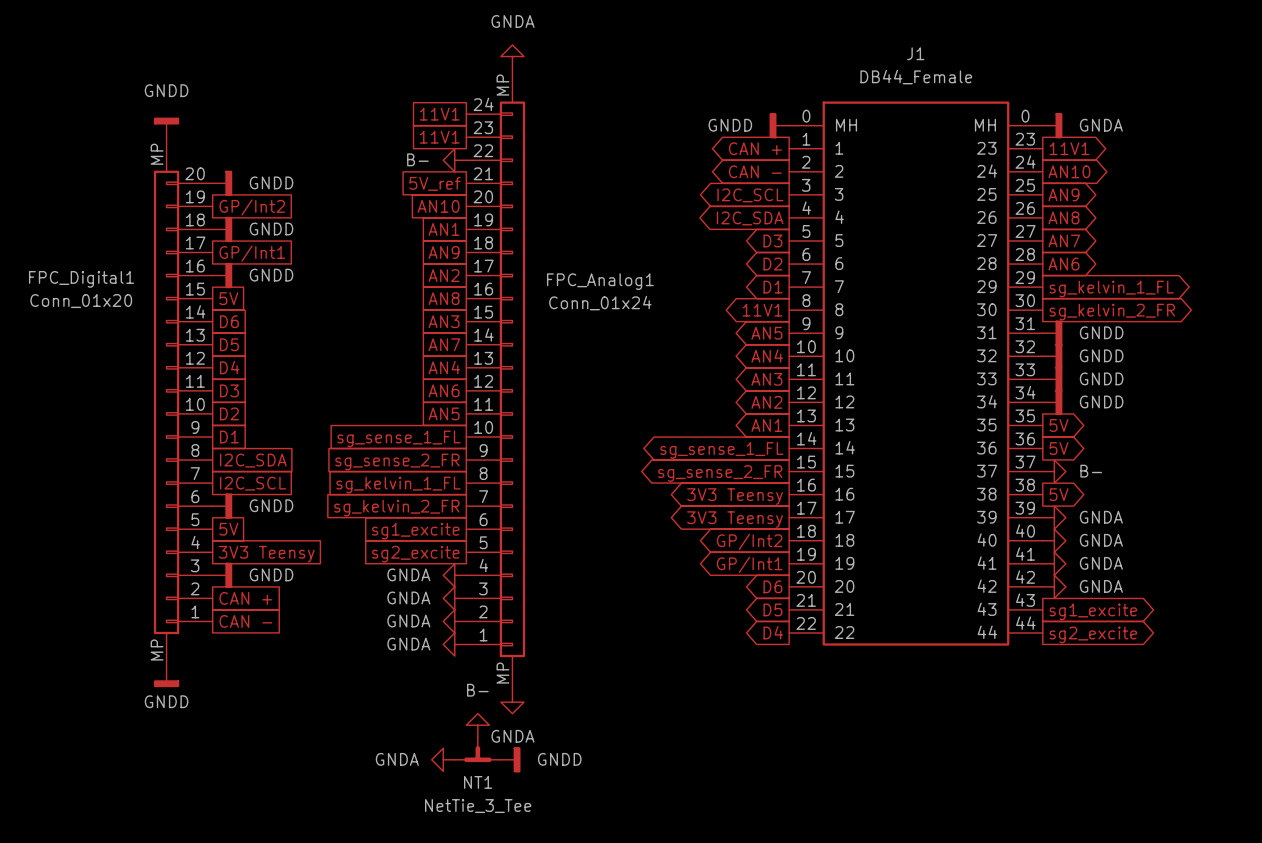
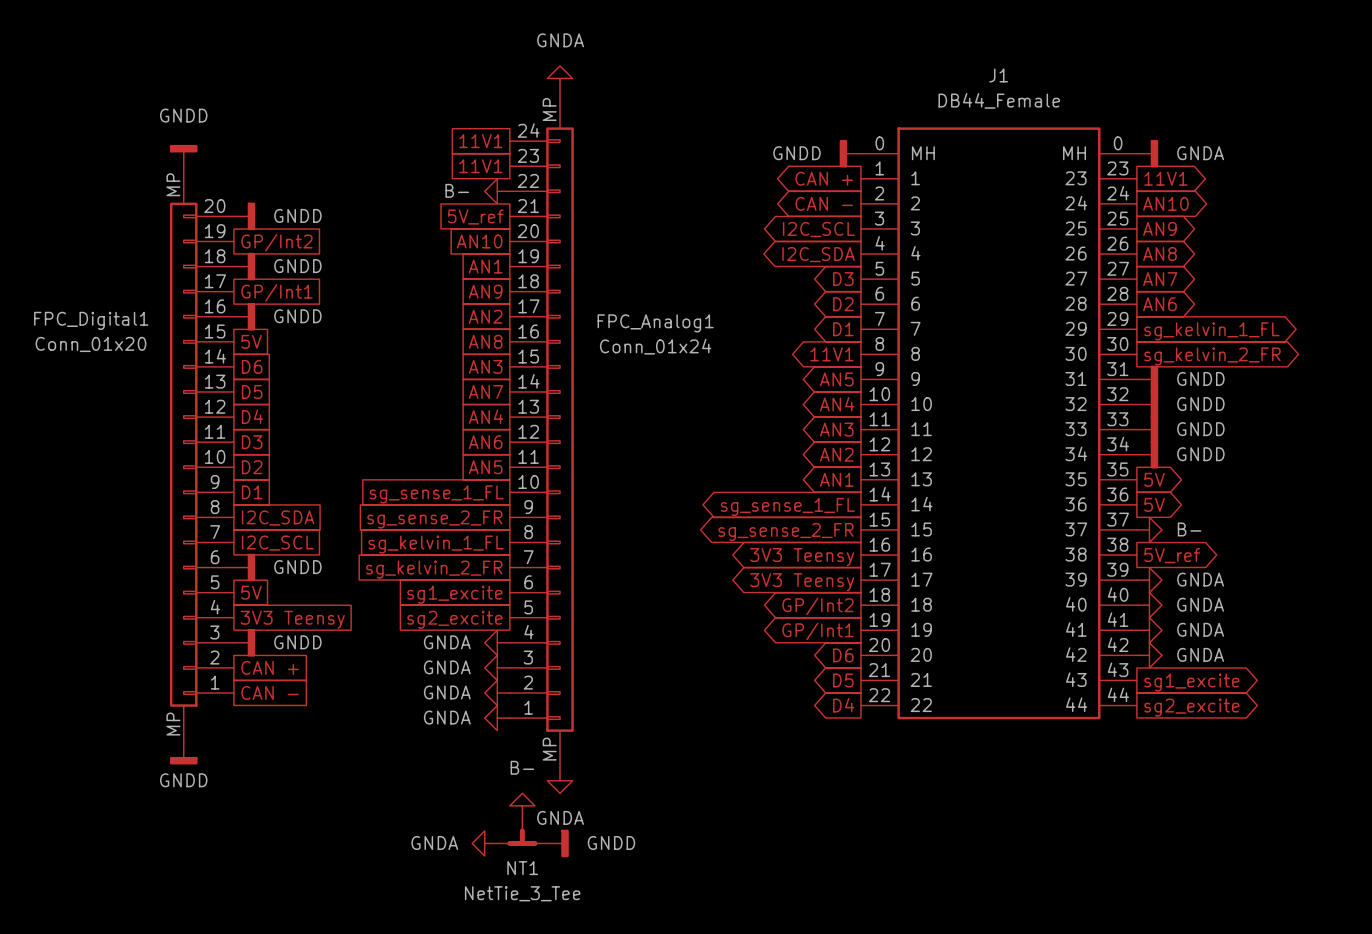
global label: 5V (1059, 494) -> 5V_ref (1172, 555)

